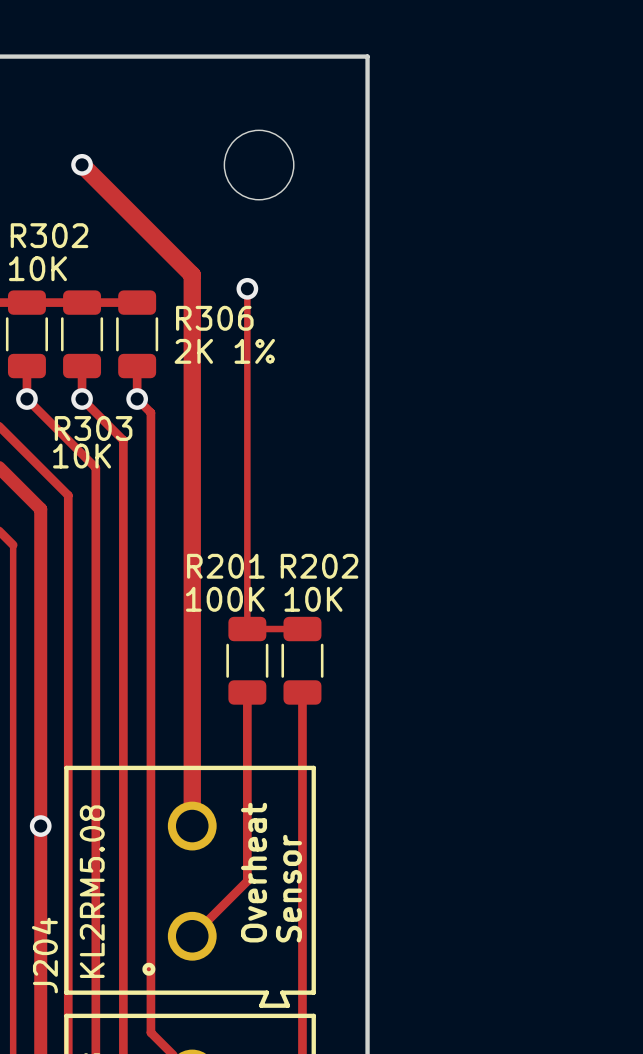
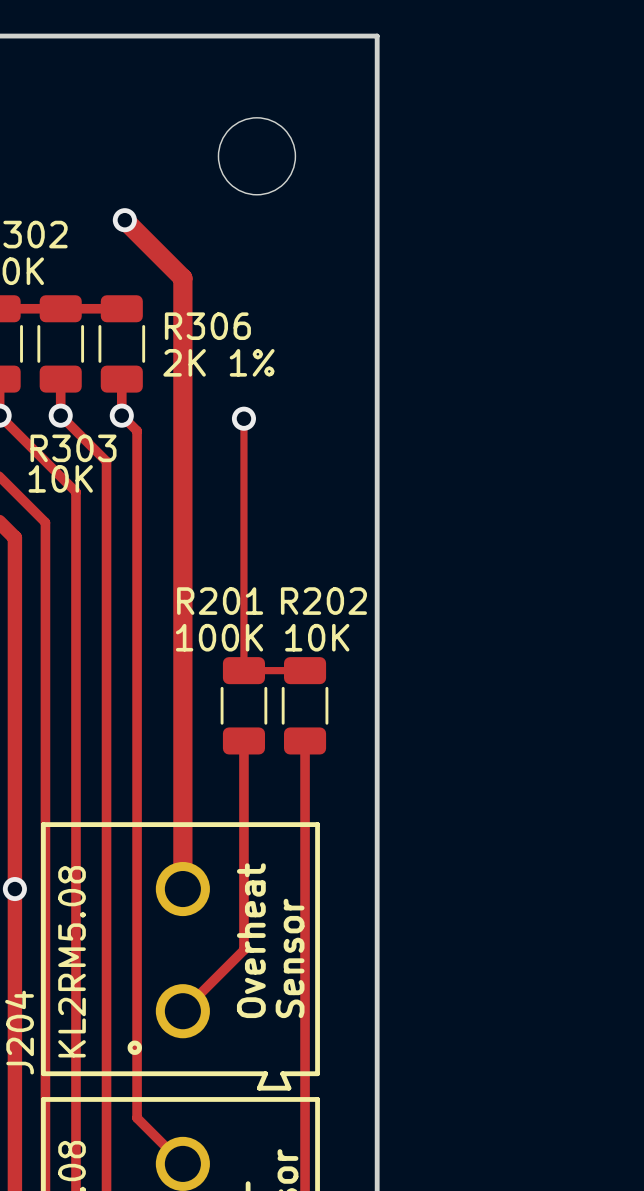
track: (82, 164) (139, 222) -> none
via: (82, 164) -> none
via: none -> (124, 220)
track: (247, 288) (247, 401) -> none
via: (247, 288) -> none
via: none -> (243, 418)

